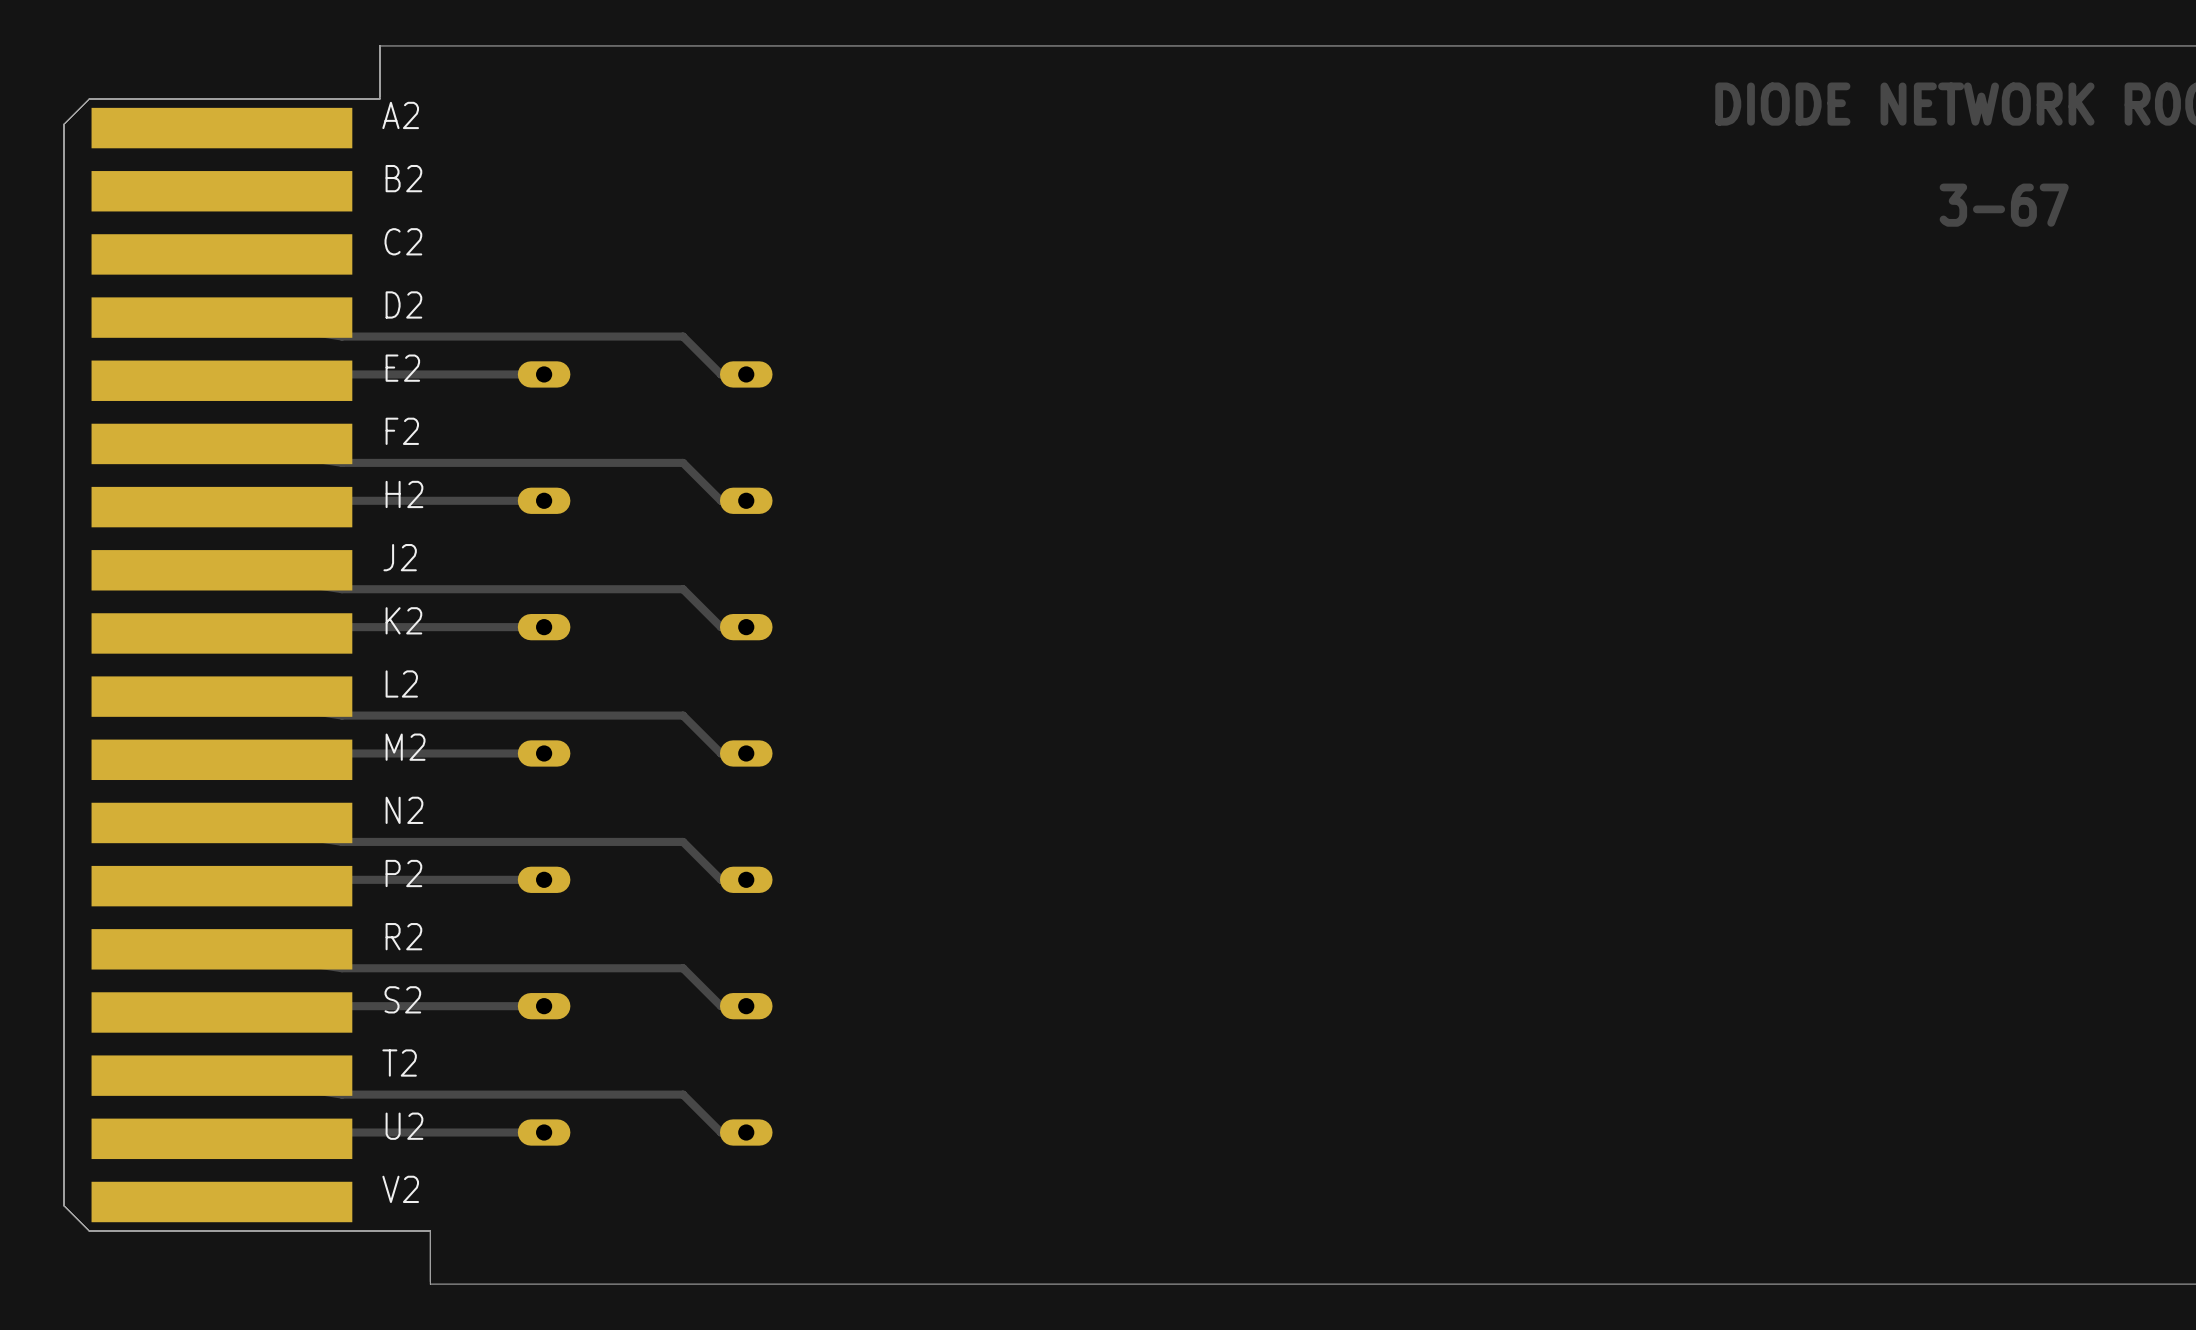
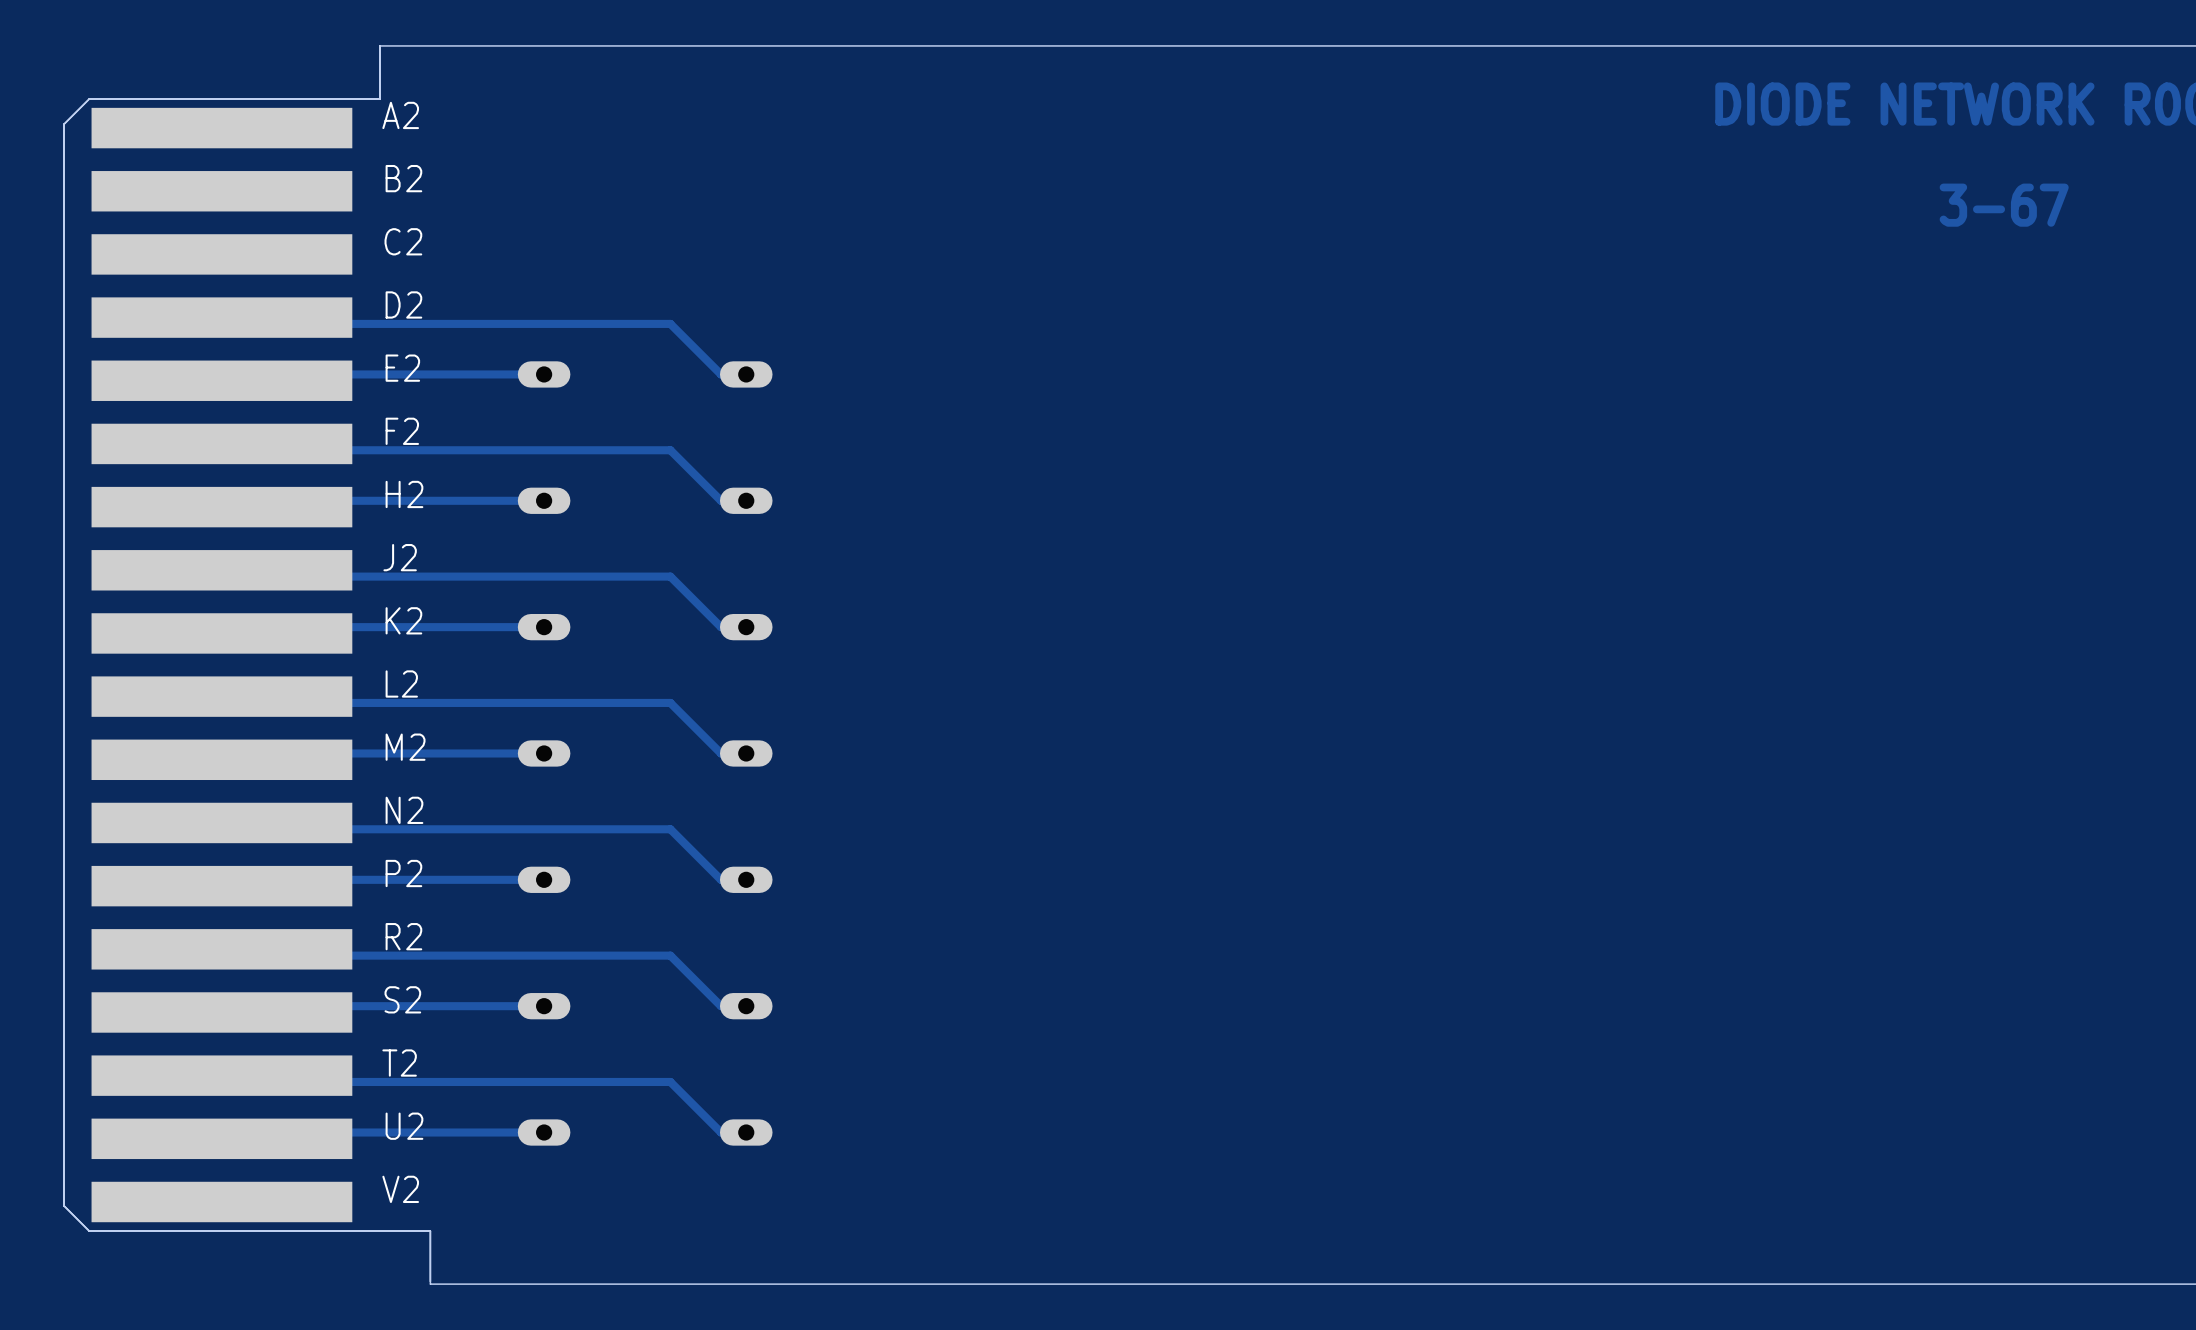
track: (221, 317) (341, 336) (683, 336) -> (221, 317) (329, 323) (670, 323) (683, 336)
track: (221, 443) (341, 462) (683, 462) -> (221, 443) (329, 450) (670, 450) (683, 462)
track: (221, 570) (341, 589) (683, 589) -> (221, 570) (329, 576) (670, 576) (683, 589)
track: (221, 696) (341, 715) (683, 715) -> (221, 696) (329, 702) (670, 702) (683, 715)
track: (221, 822) (341, 841) (683, 841) -> (221, 822) (329, 829) (670, 829) (683, 841)
track: (221, 949) (341, 968) (683, 968) -> (221, 949) (329, 955) (670, 955) (683, 968)
track: (221, 1075) (341, 1094) (683, 1094) -> (221, 1075) (329, 1081) (670, 1081) (683, 1094)

